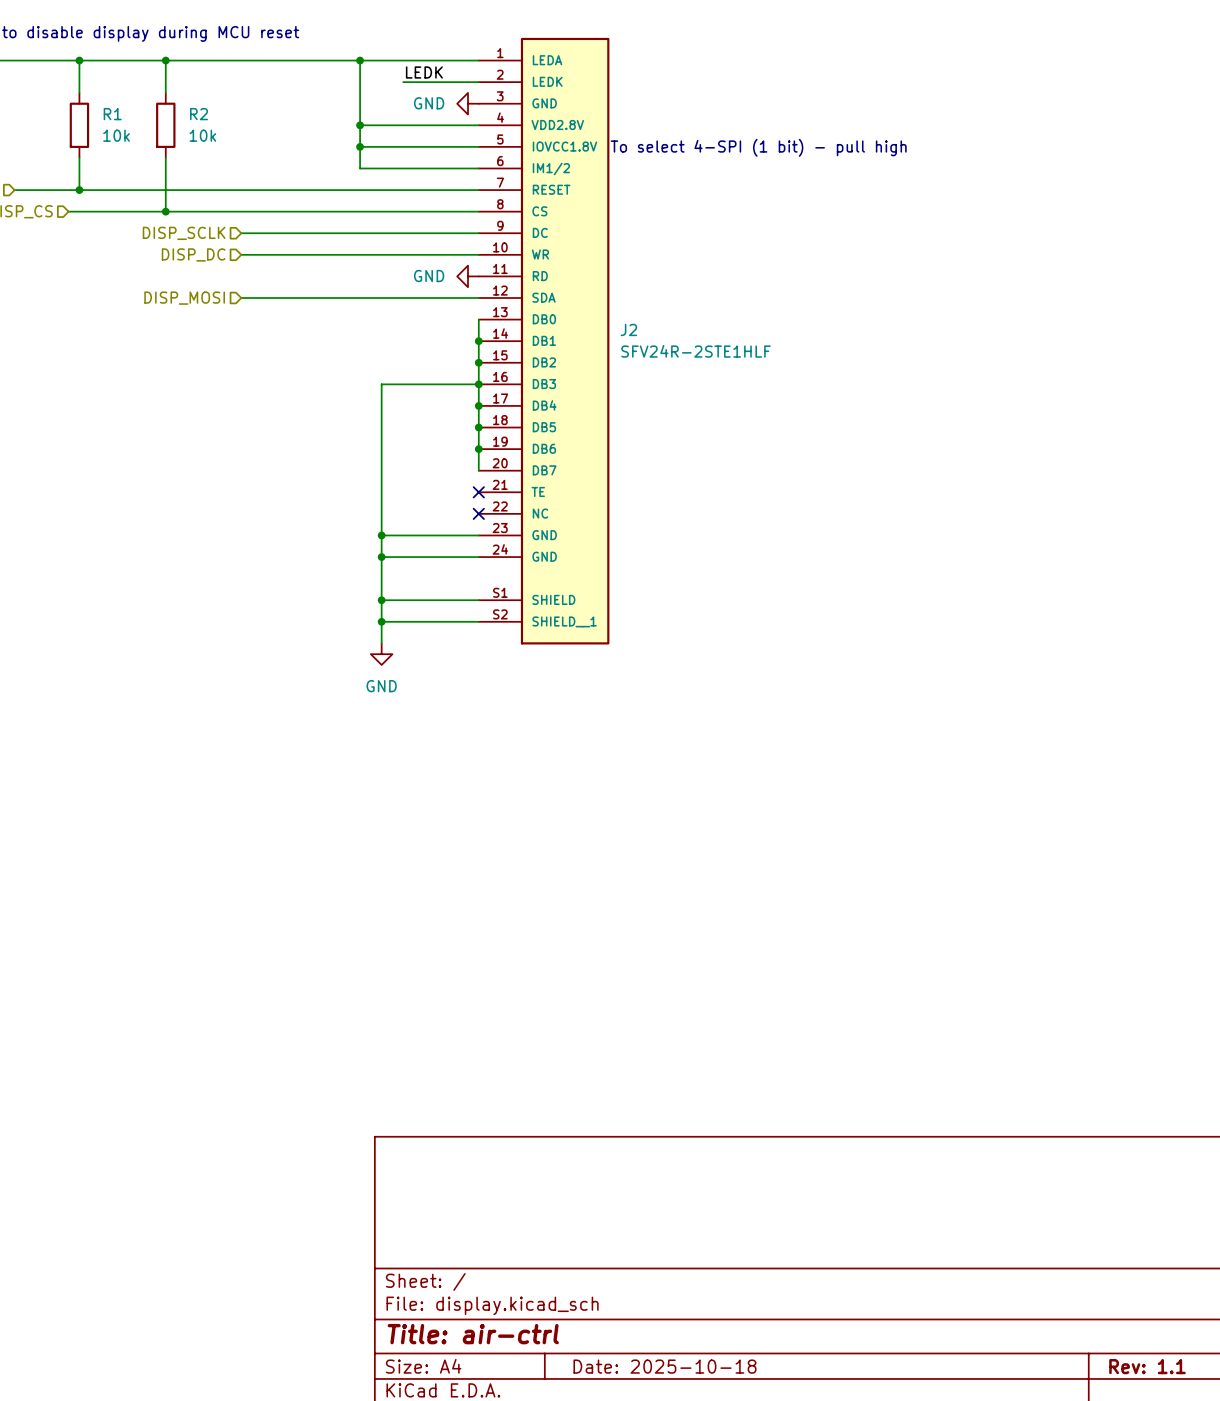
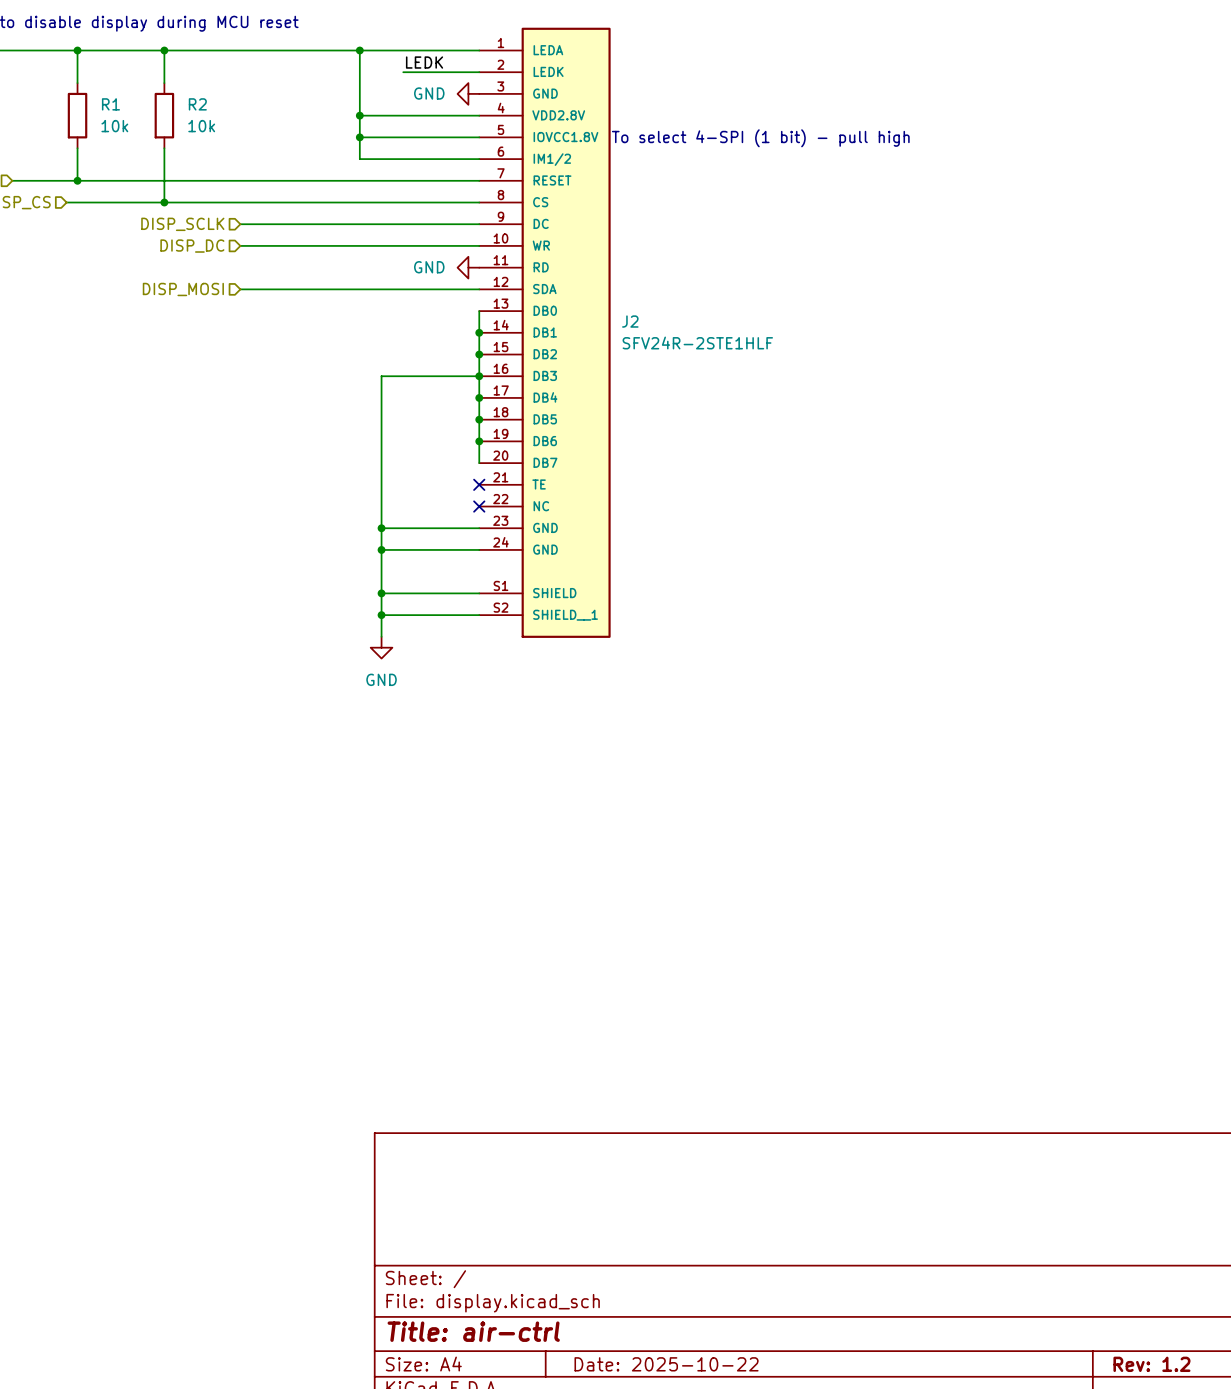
title block: Date: 2025-10-18 (664, 1366) -> Date: 2025-10-22 (666, 1364)
title block: Rev: 1.1 (1147, 1366) -> Rev: 1.2 (1151, 1364)

